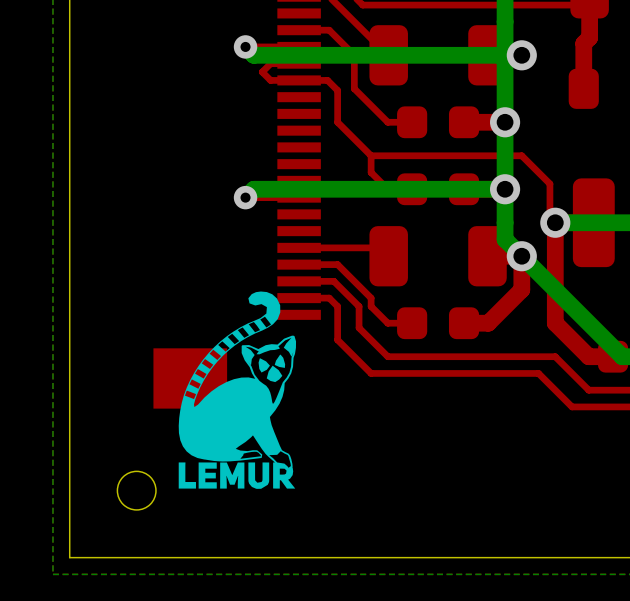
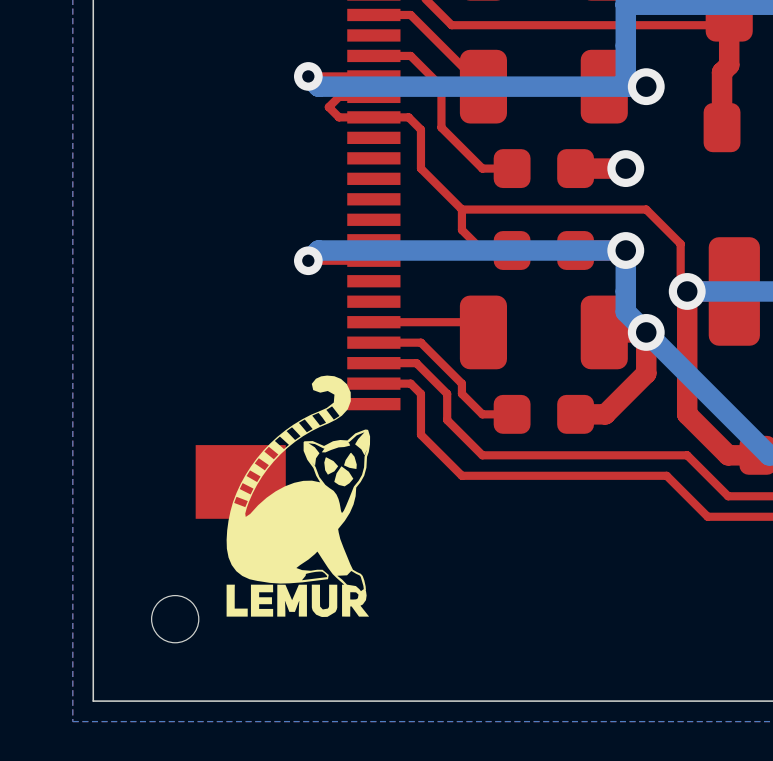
bottom track: (505, 55) (505, 189) -> none

